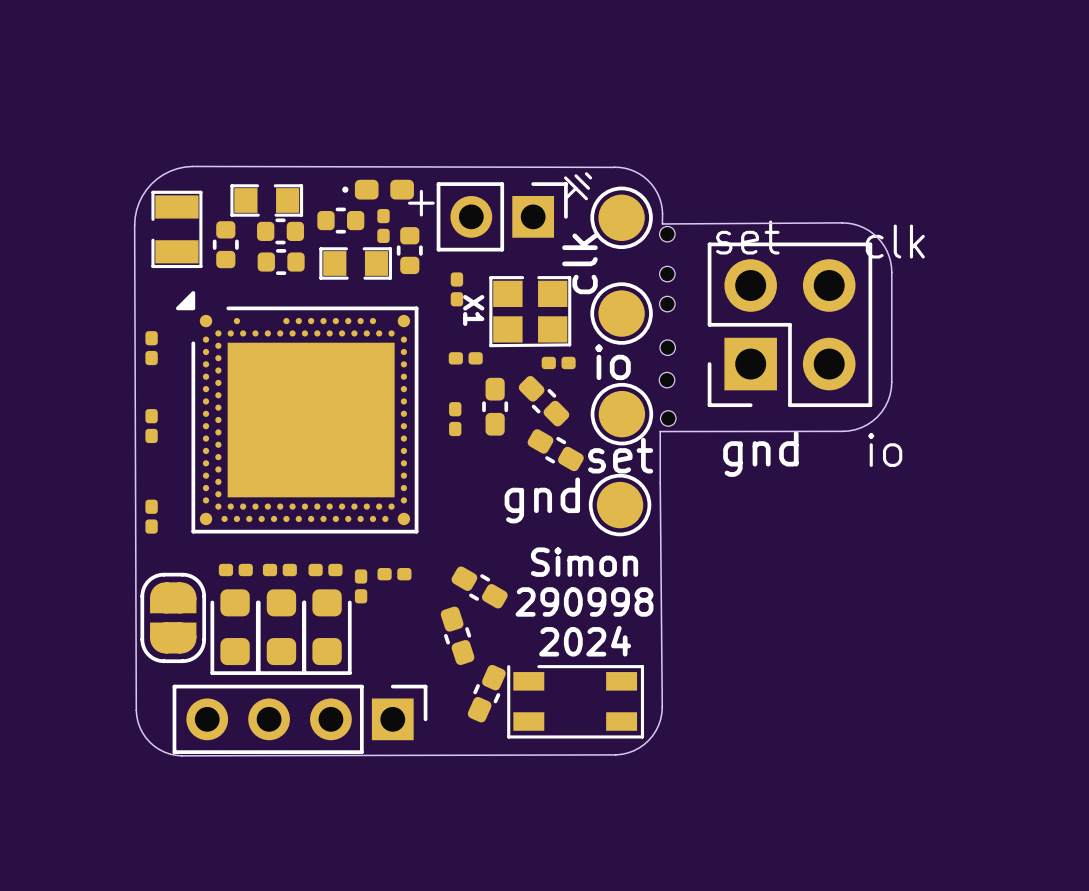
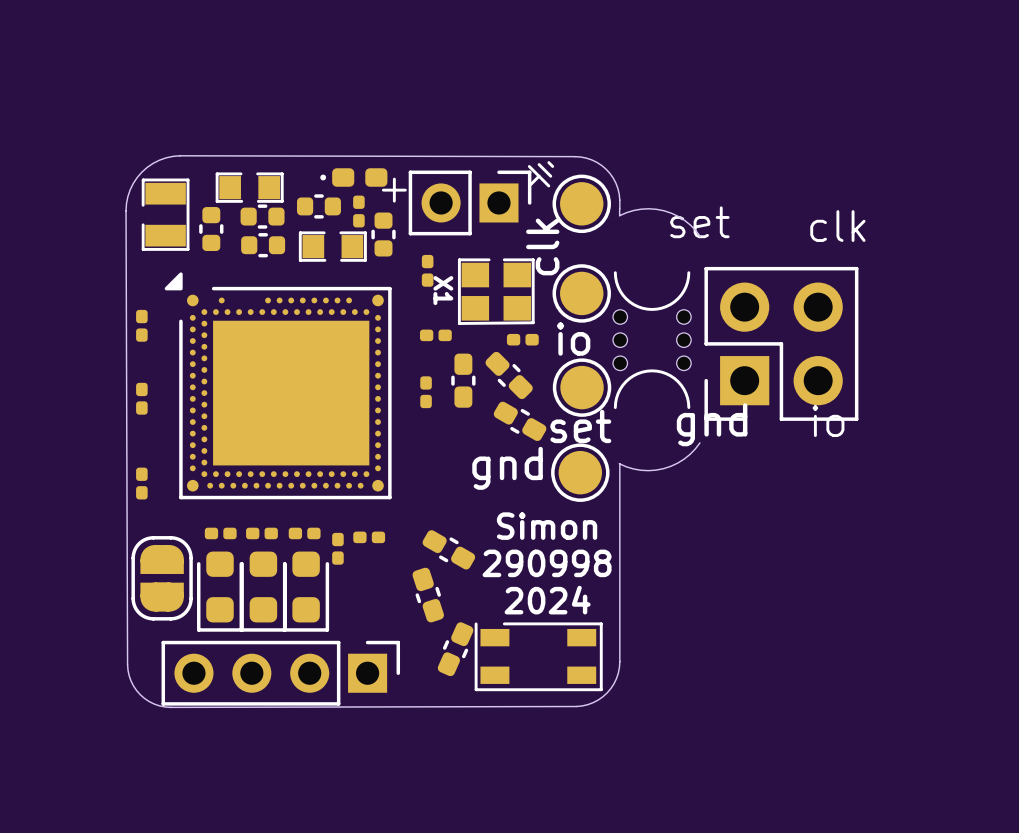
board edge: (614, 167) (634, 171) (651, 184) (661, 203) (662, 223) (853, 224) (868, 230) (877, 237) (886, 250) (891, 266) (891, 388) (885, 406) (872, 421) (861, 427) (843, 431) (660, 431) (662, 706) -> (619, 463) (619, 661)
board edge: none -> (574, 156) (591, 159) (610, 173) (619, 194) (619, 215) (641, 209) (663, 210) (684, 220) (700, 236)
part: (667, 234) -> none
part: (667, 274) -> none
part: (667, 304) -> none
part position: (789, 324) -> (781, 343)
part: (667, 347) -> none
part: none -> (652, 340)
part: (667, 380) -> none
part: (668, 418) -> none
board edge: none -> (699, 442) (684, 459) (663, 468) (640, 470) (619, 463)

